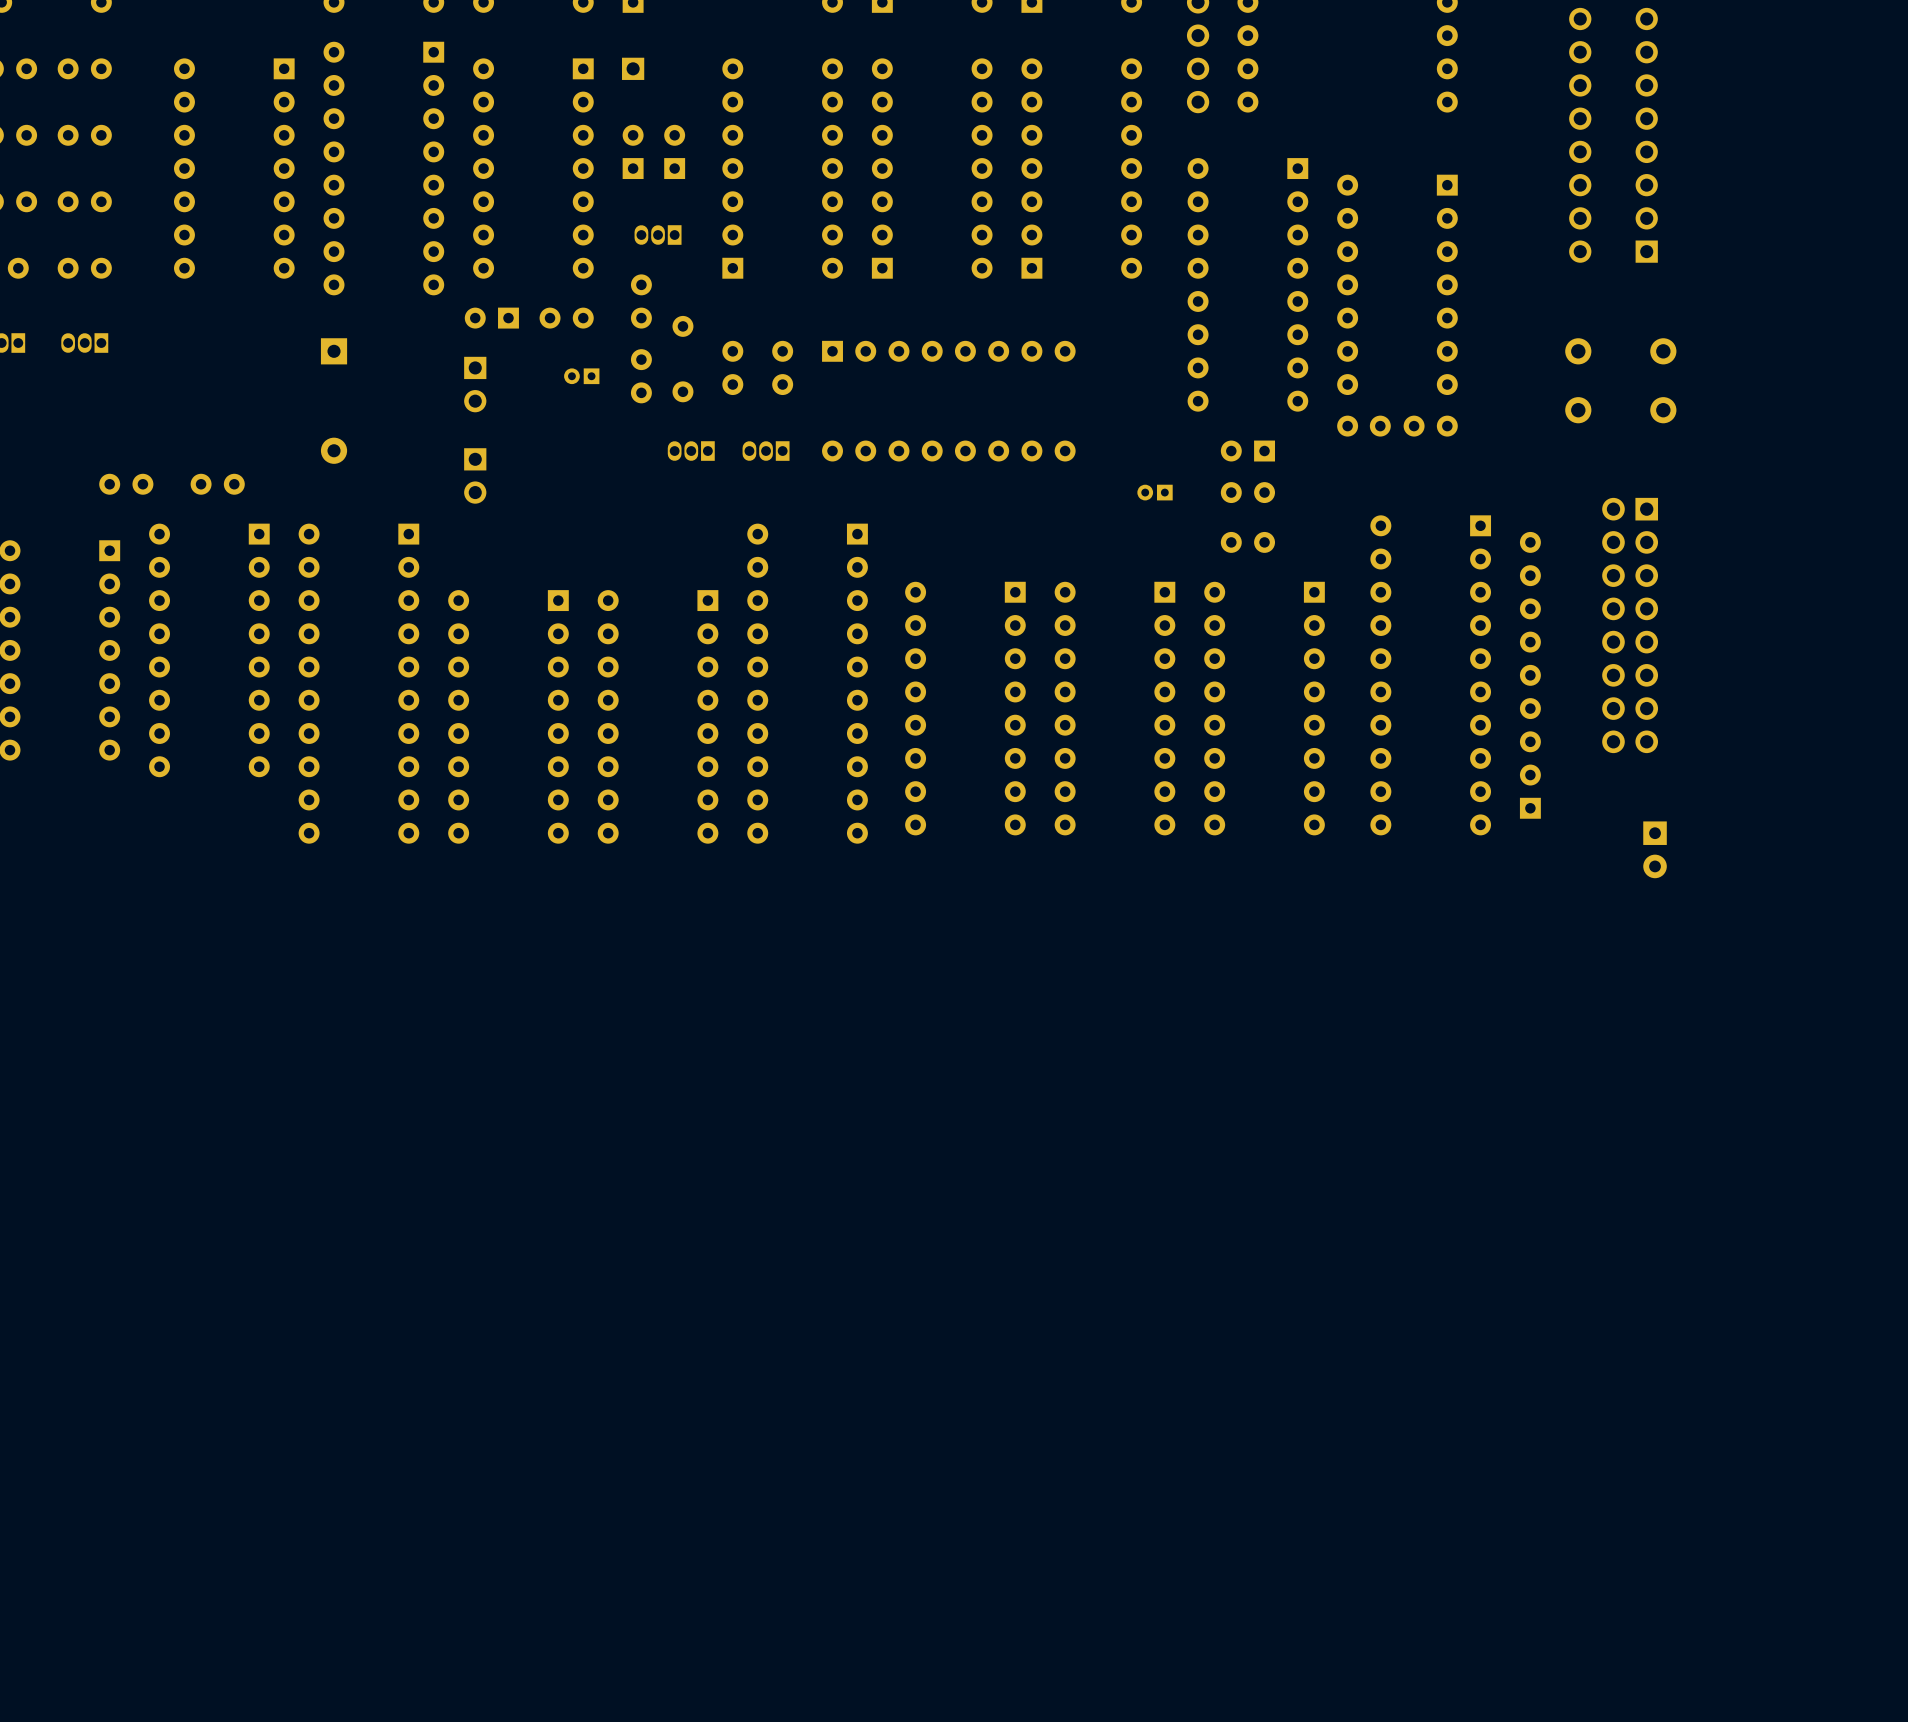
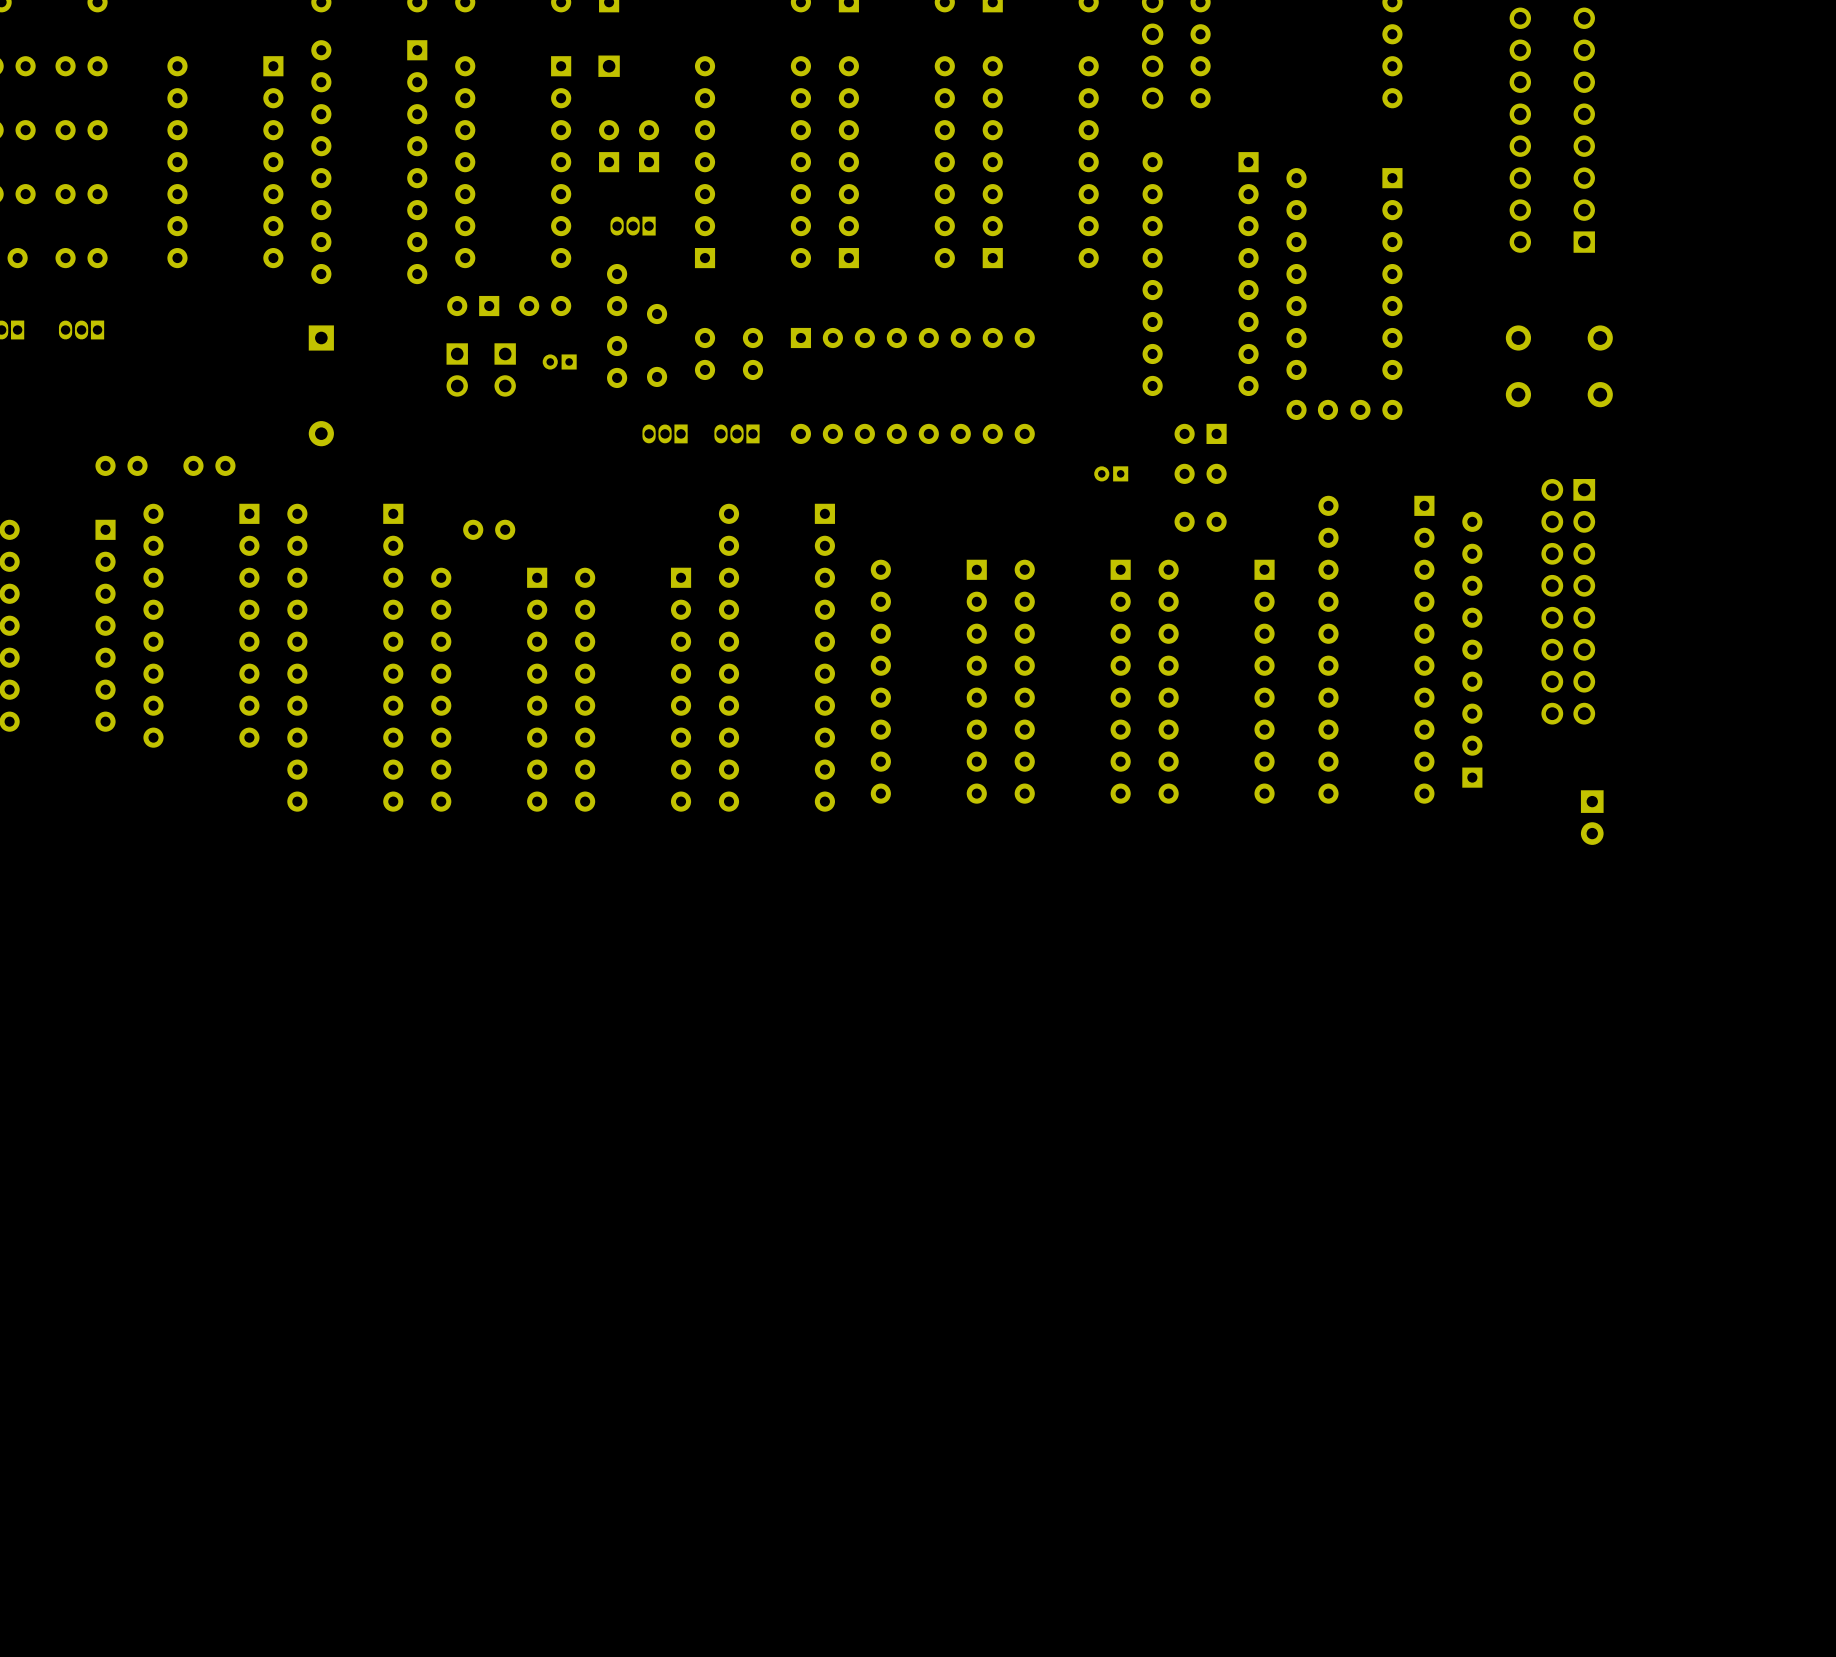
part position: (475, 475) -> (505, 369)
part: none -> (489, 529)

